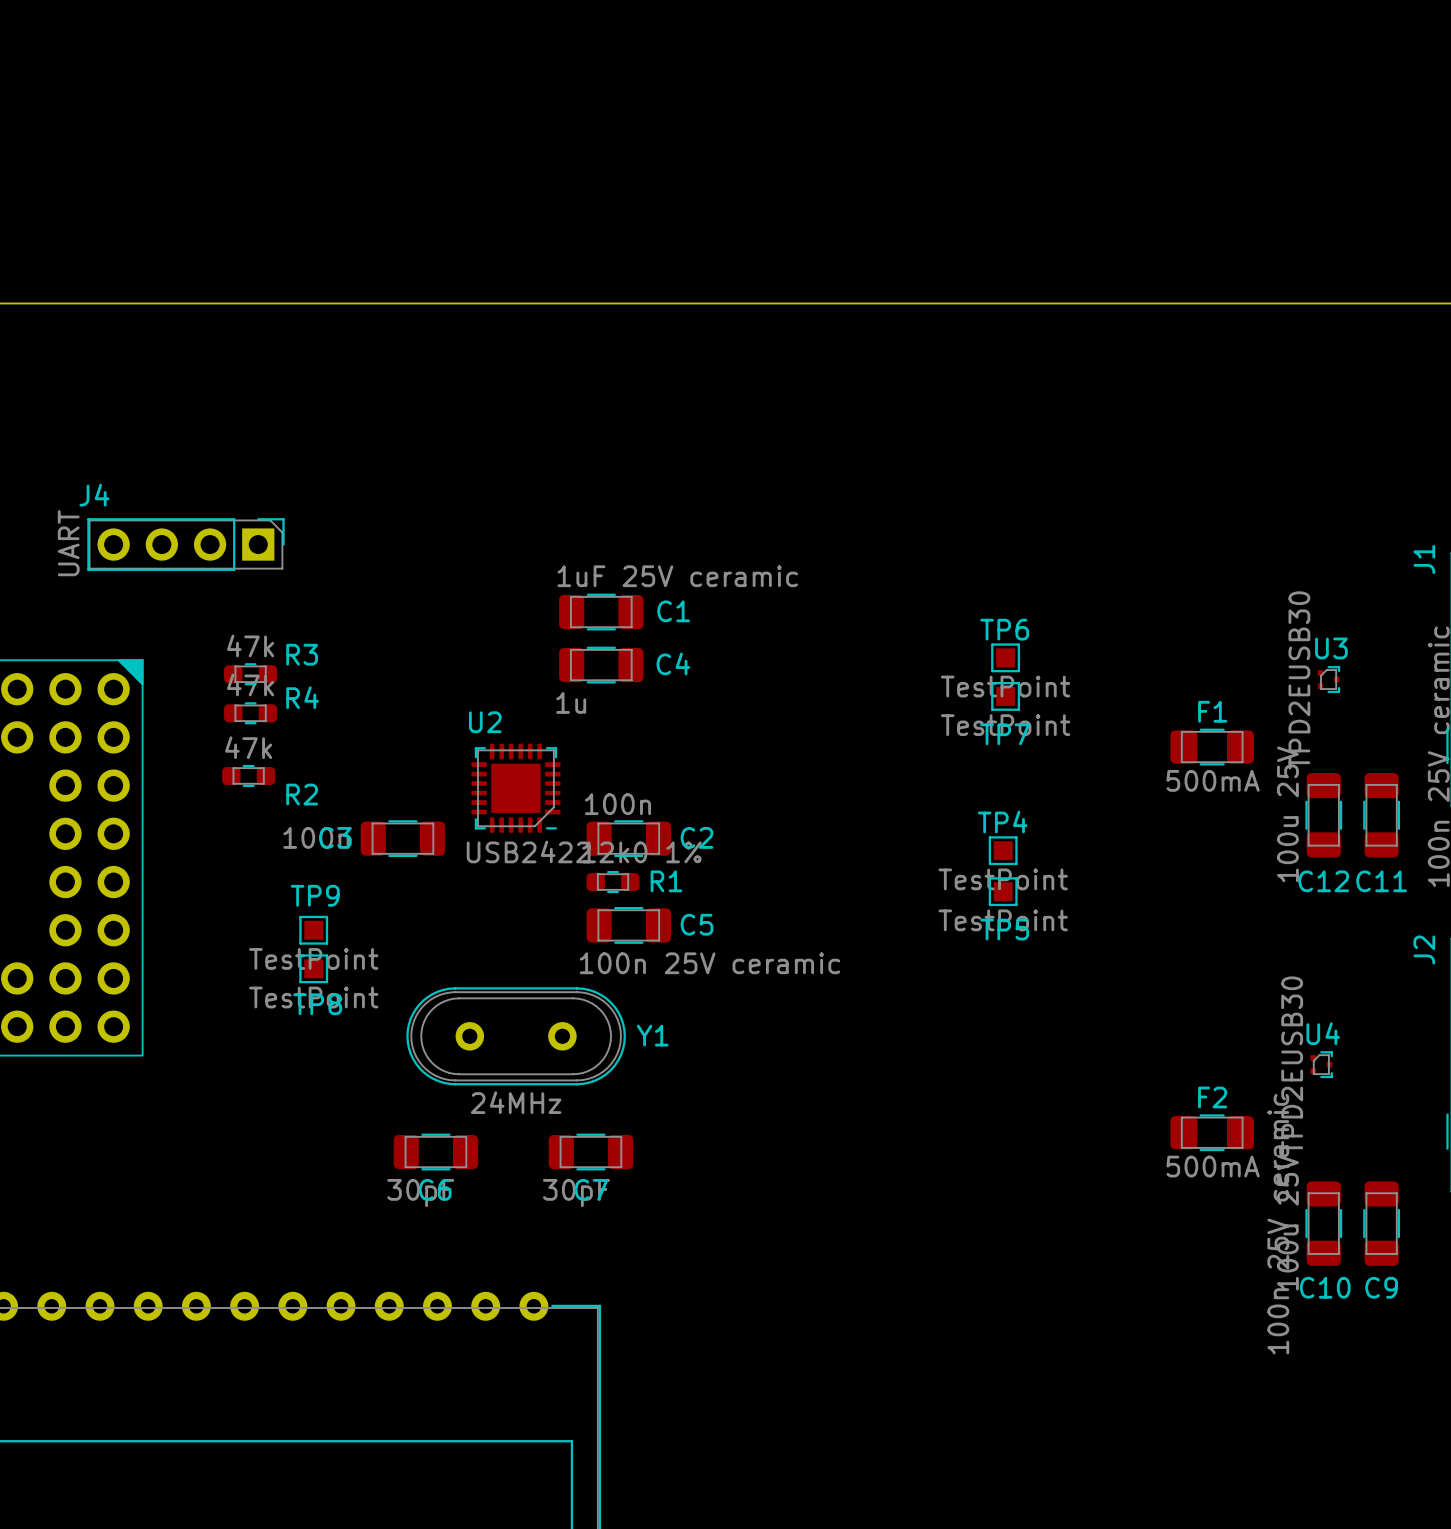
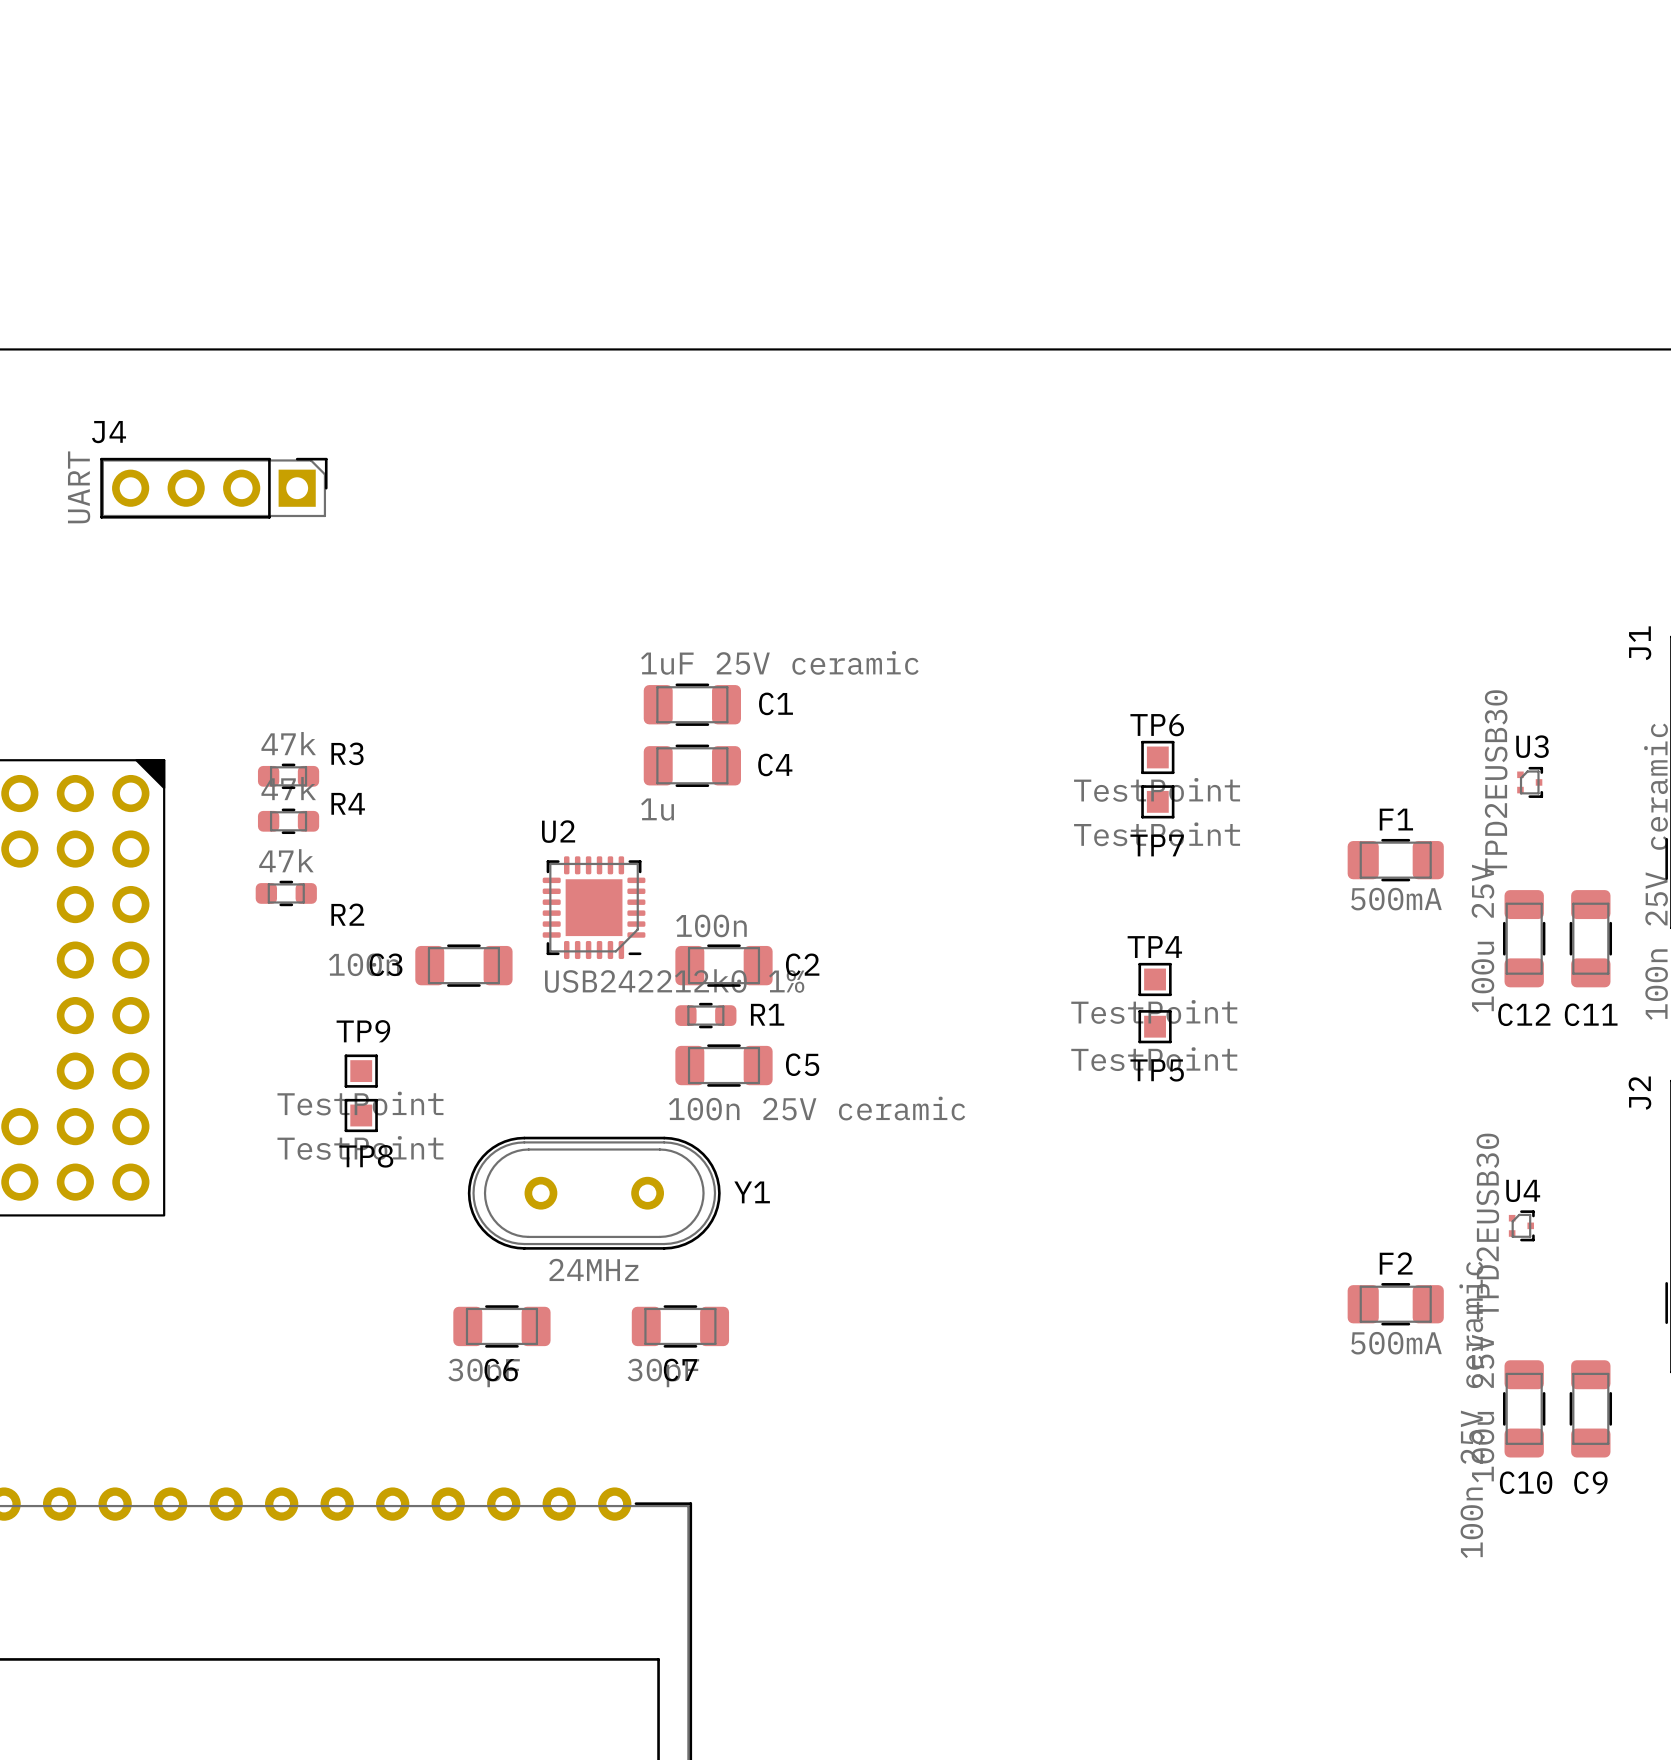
J4 position: (185, 544) -> (213, 488)

